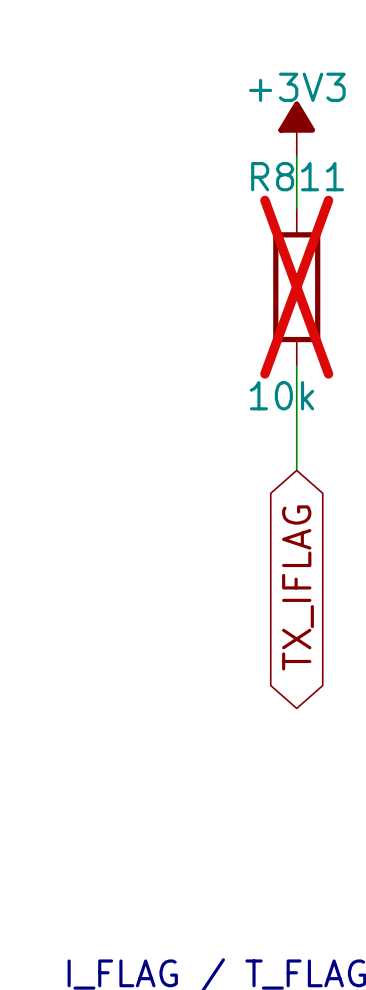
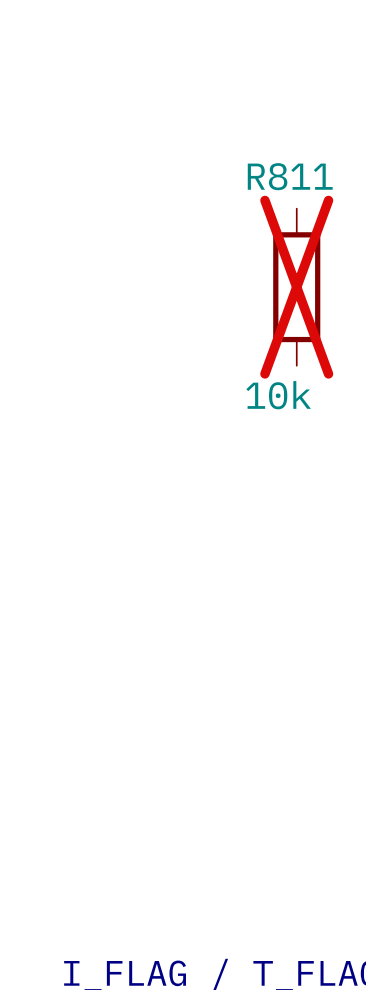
power symbol: +3V3 (296, 128) -> none
wire: (296, 156) (296, 208) -> none
wire: (296, 365) (296, 470) -> none
global label: TX_IFLAG (297, 587) -> none

